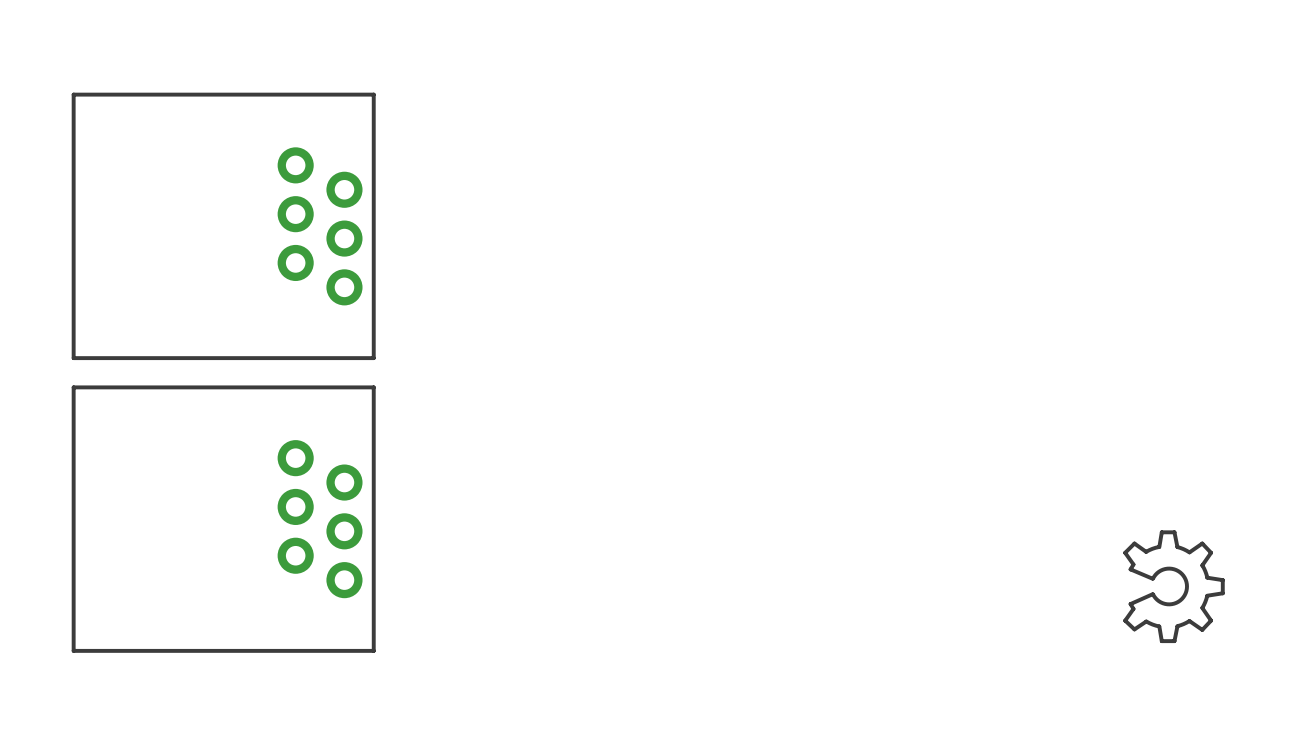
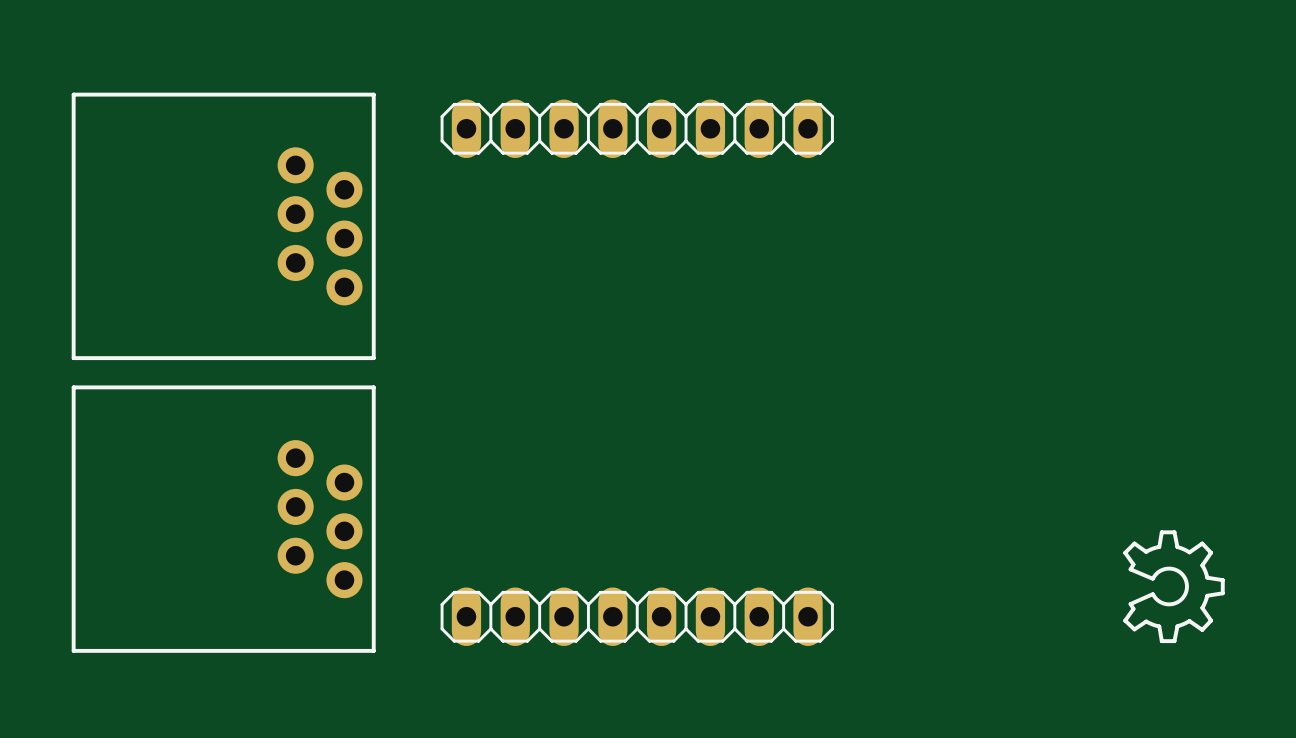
part: none -> (637, 128)
part: none -> (637, 616)

